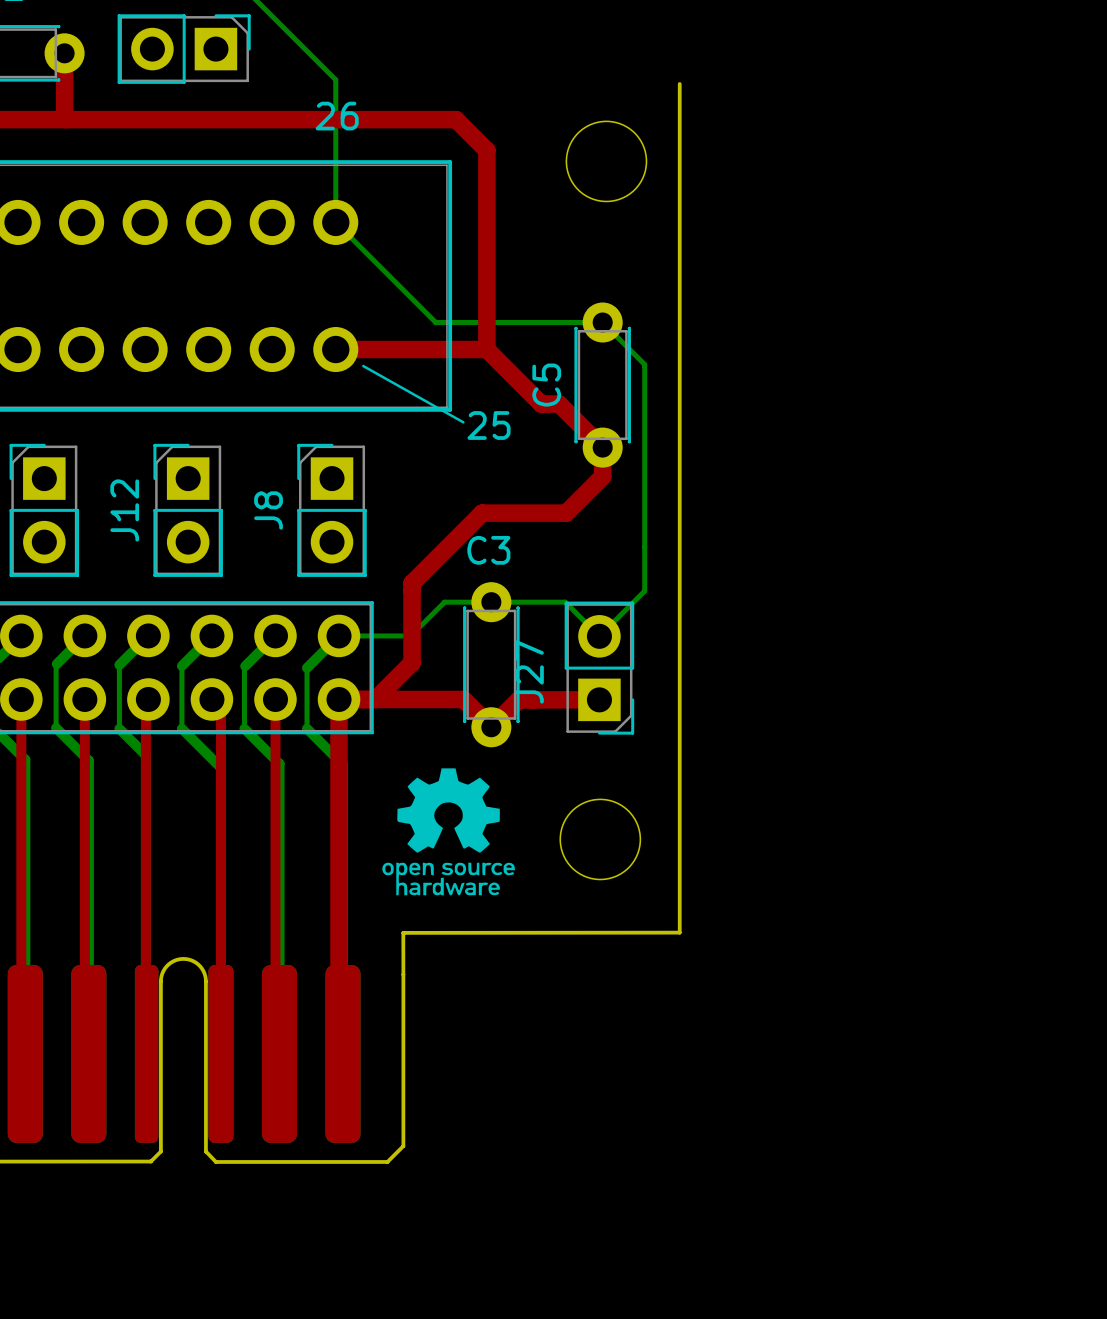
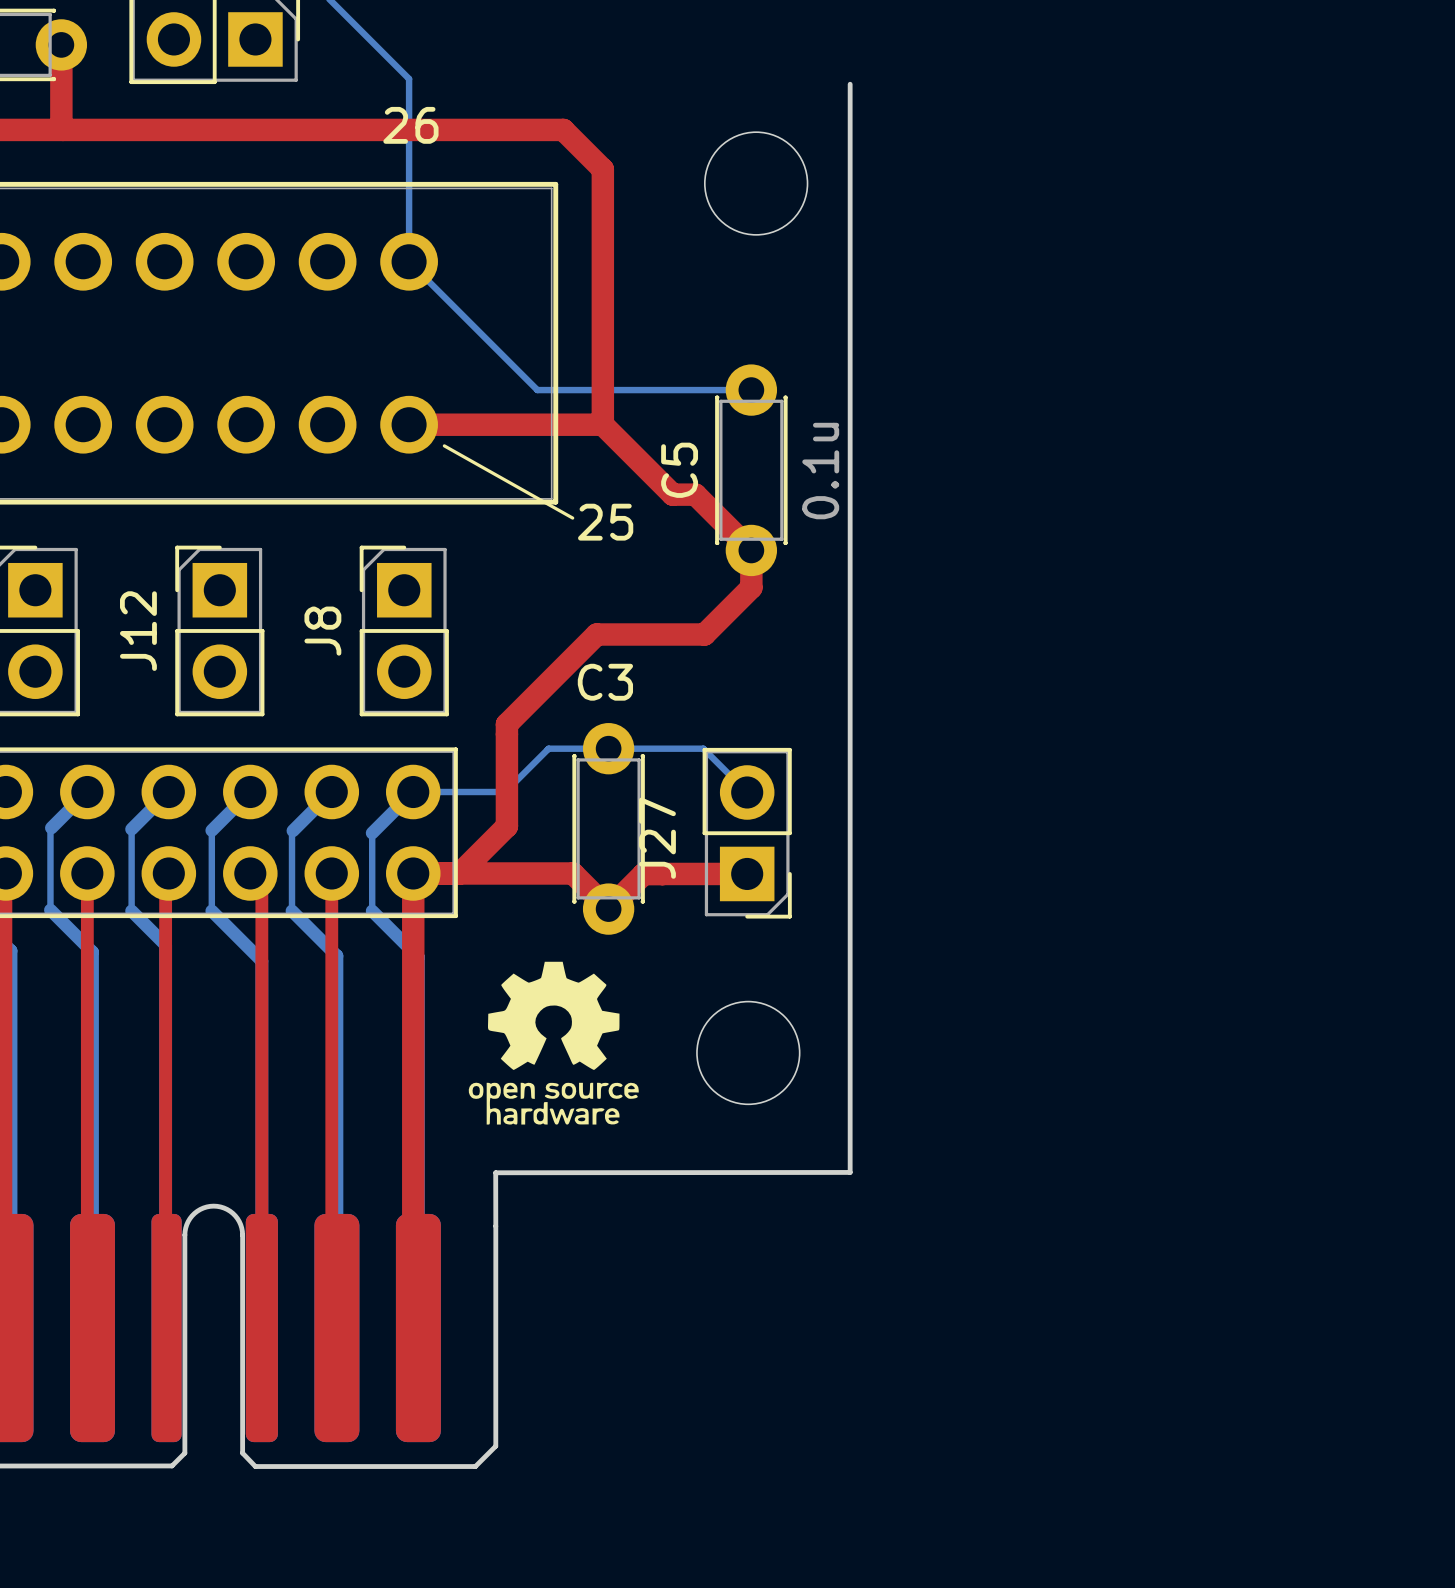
bottom track: (602, 322) (644, 364) (644, 591) (599, 636) -> none
C5 value: none -> 0.1u (820, 471)

